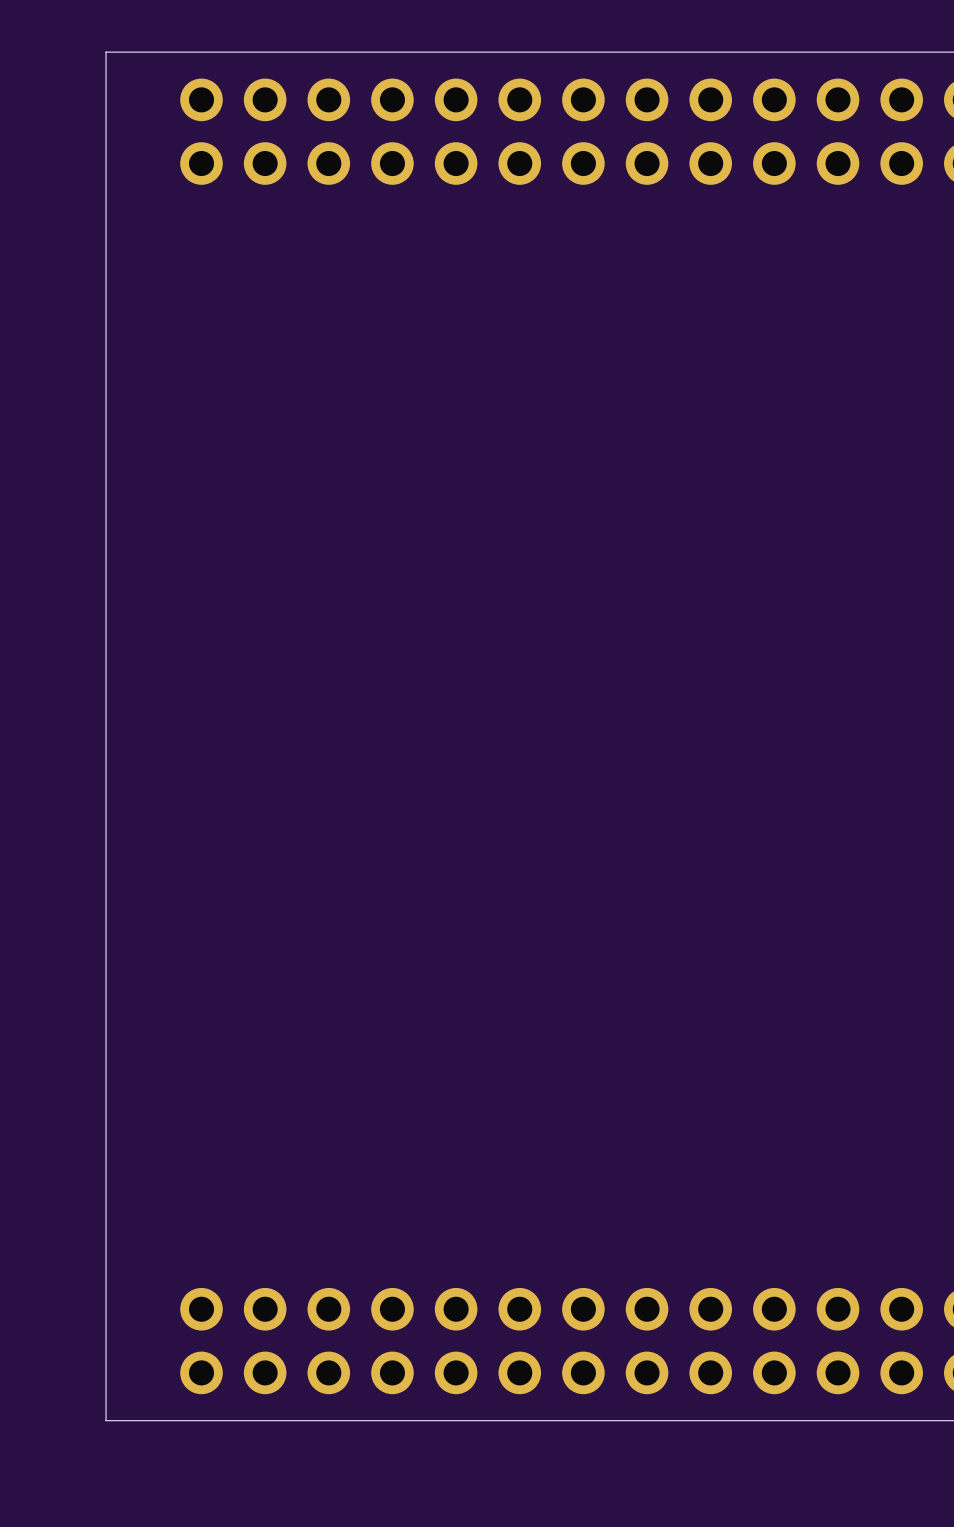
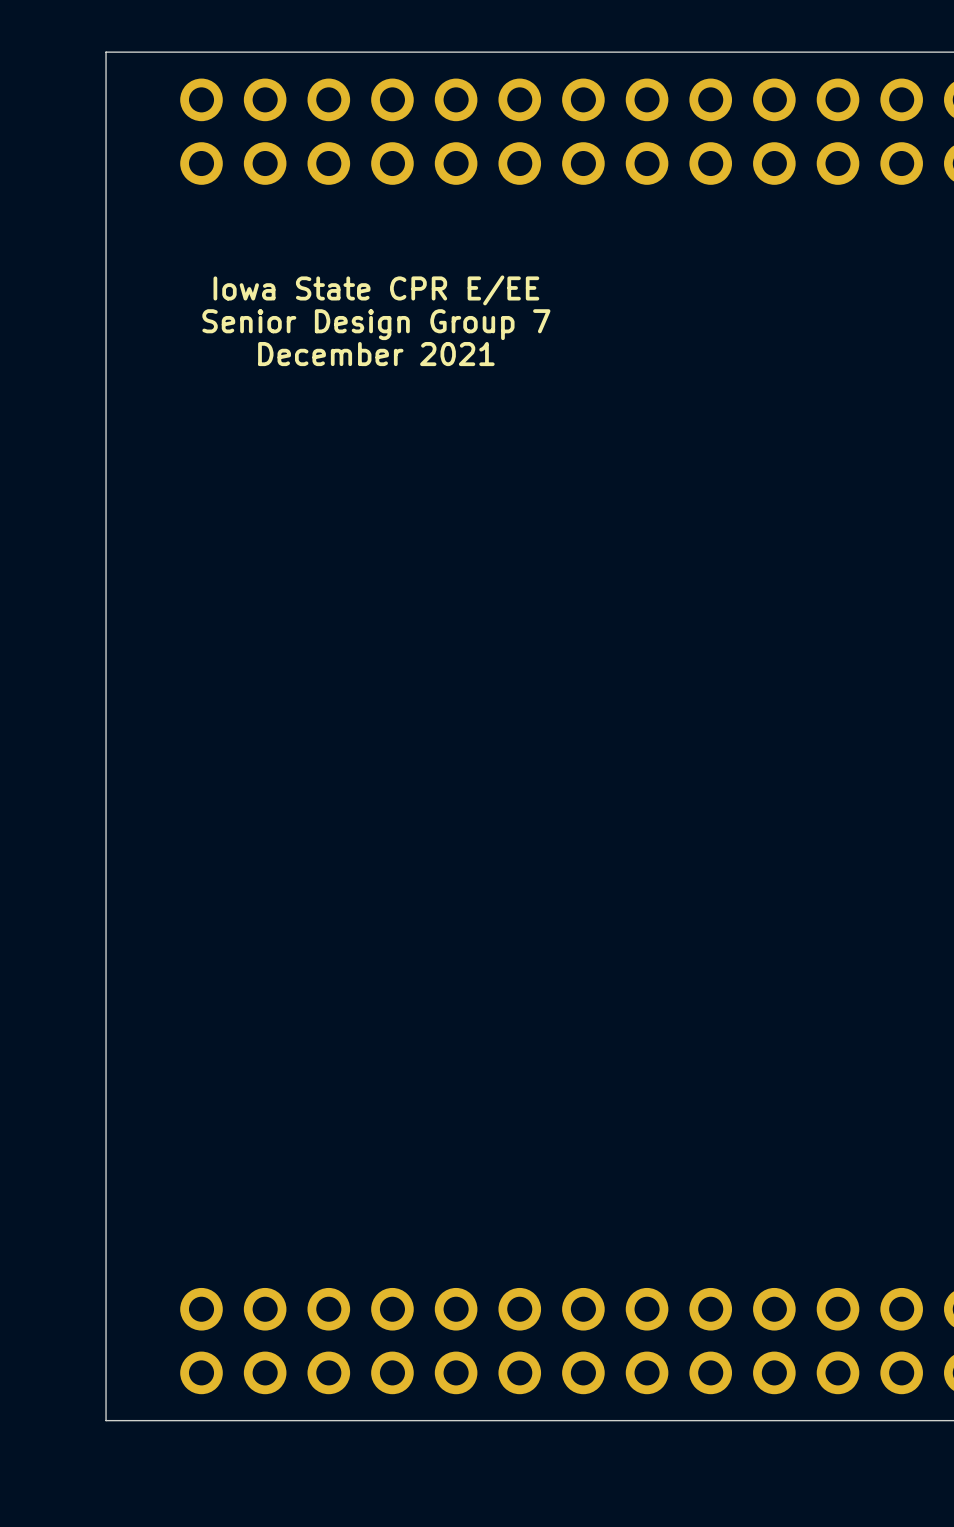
text: none -> Iowa State CPR E/EE (376, 290)
text: none -> Senior Design Group 7 (376, 324)
text: none -> December 2021 (376, 354)

